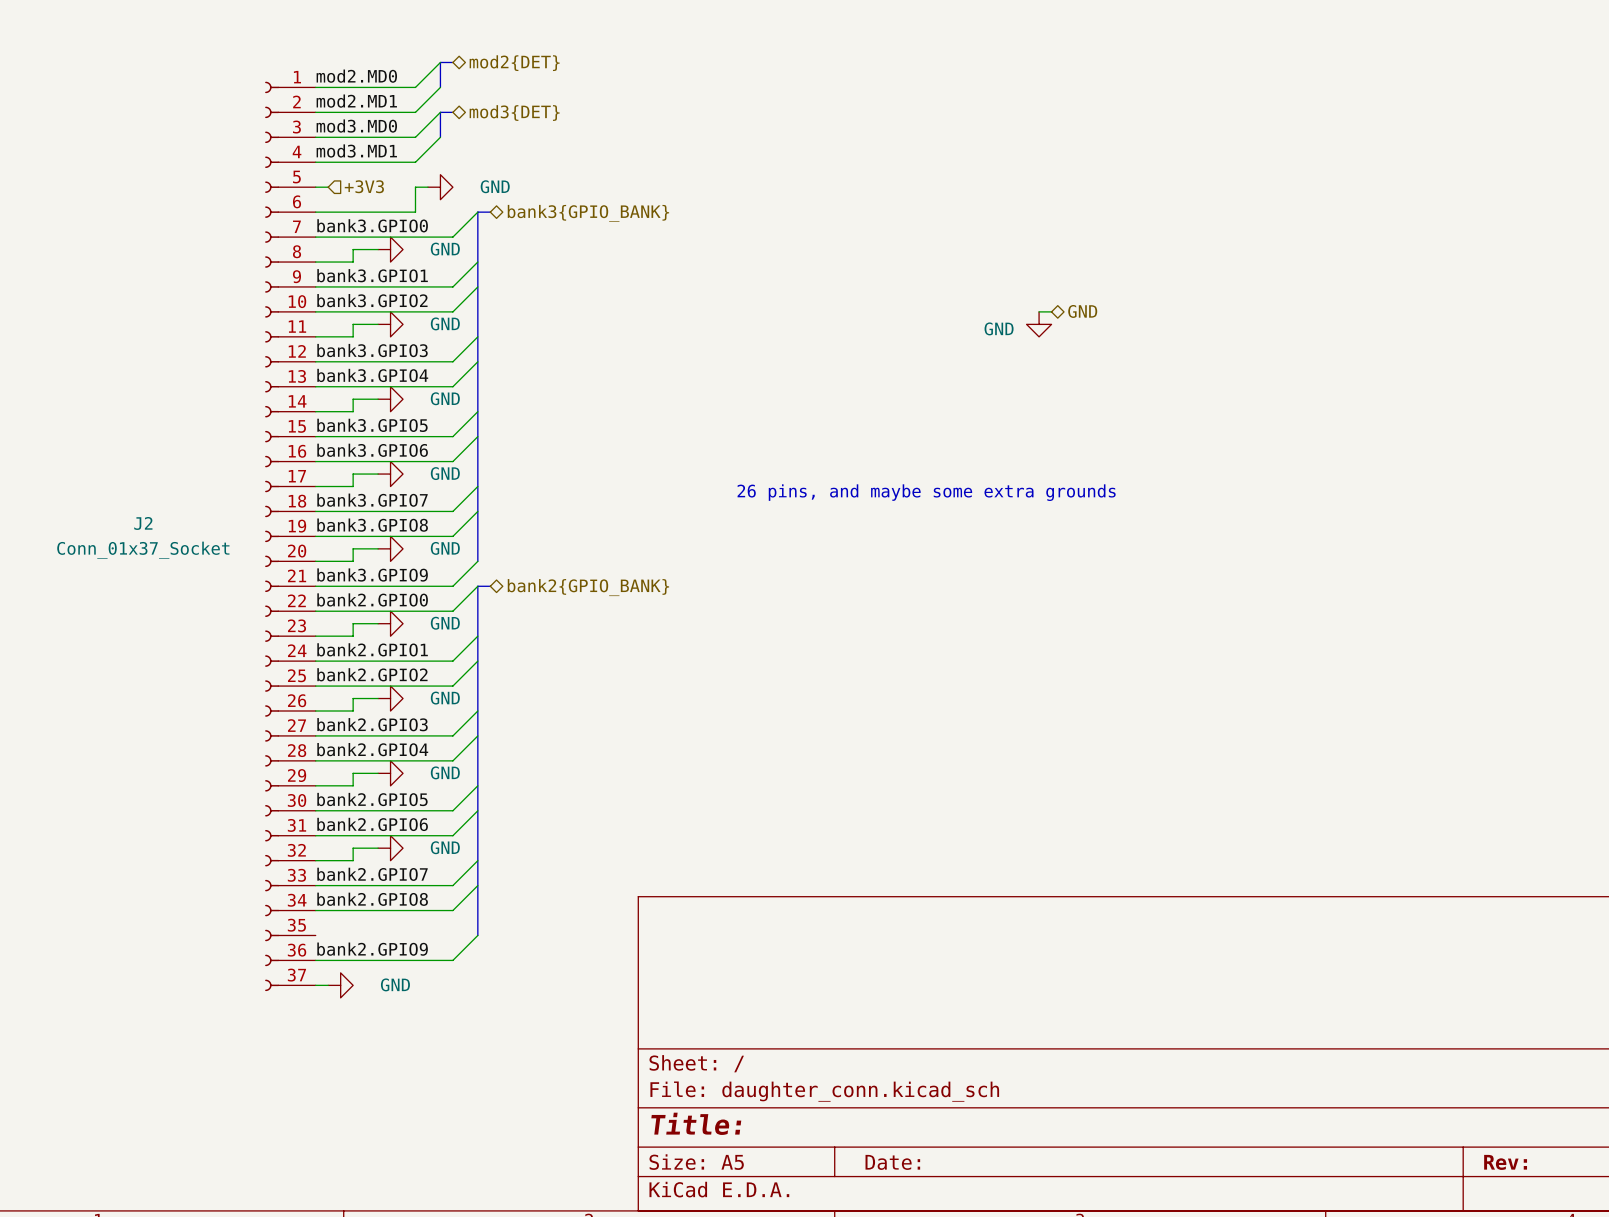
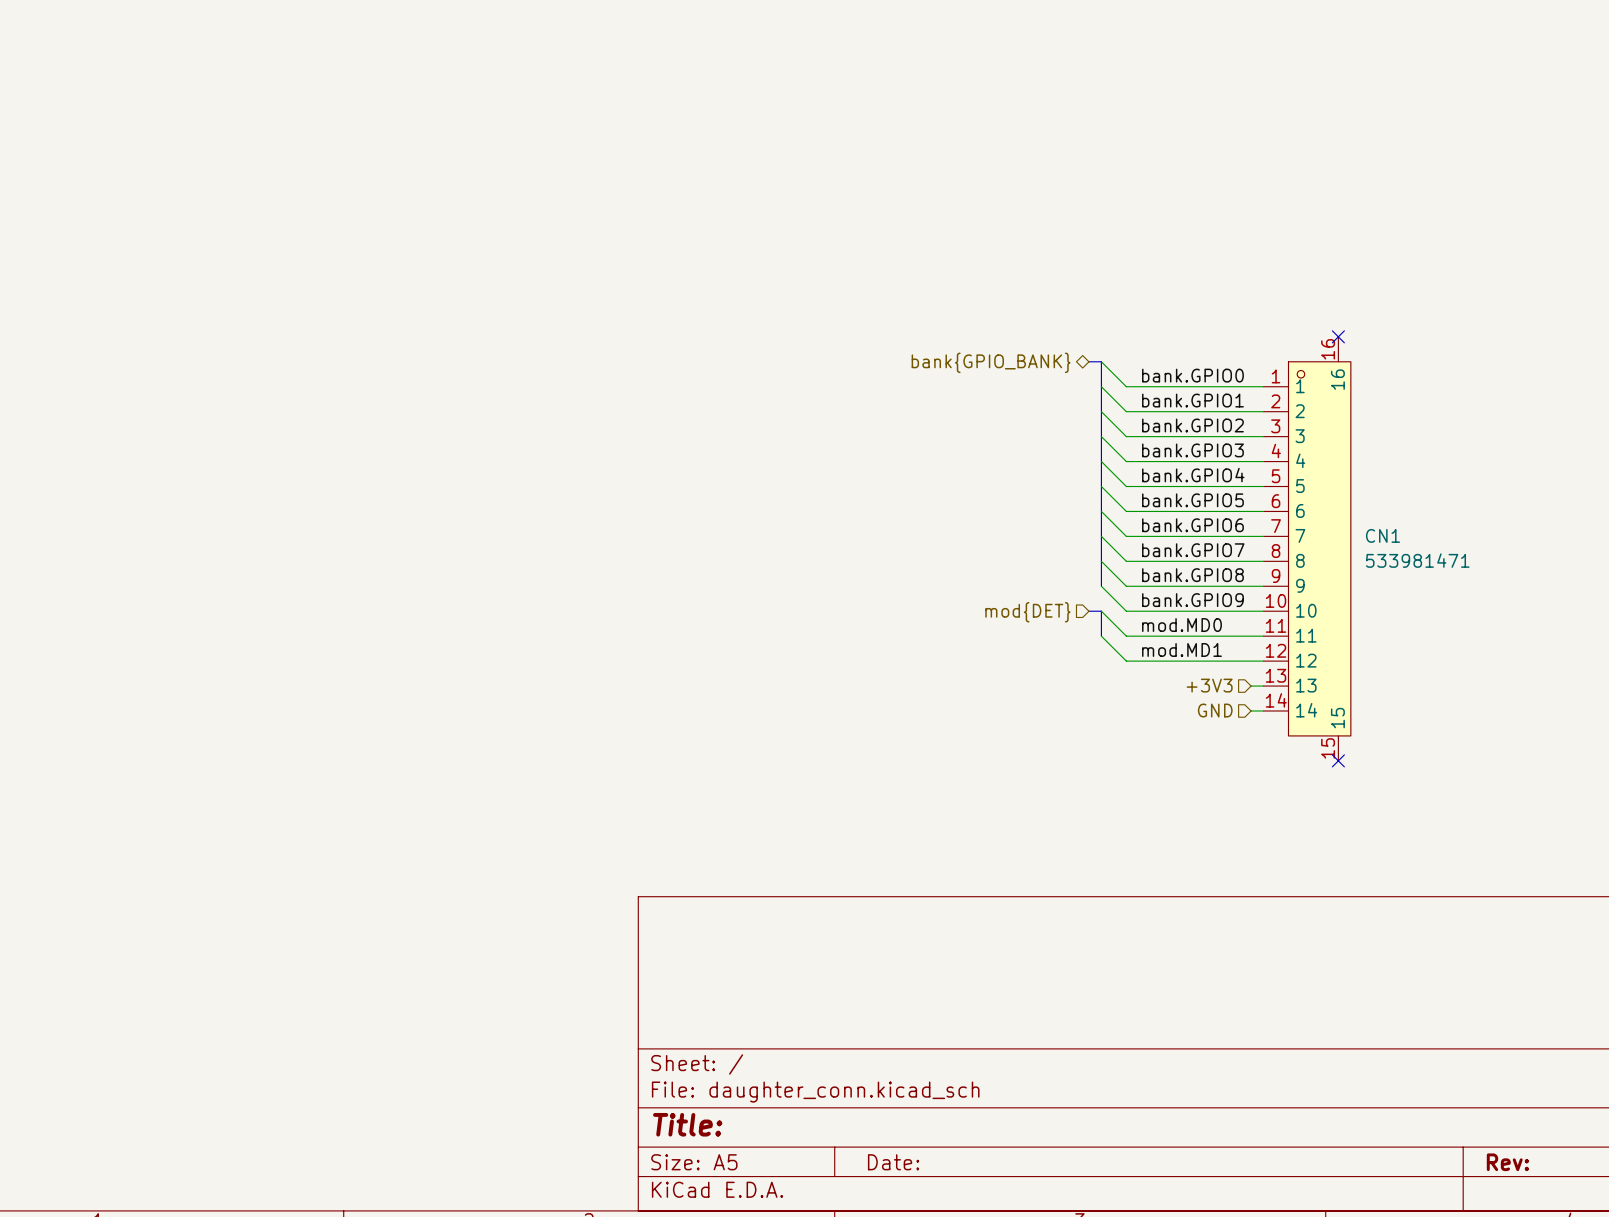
wire: (440, 62) (415, 87) (315, 87) -> none
bus: (452, 62) (440, 62) (440, 87) -> none
hierarchical label: mod2{DET} (514, 63) -> none
label: mod2.MD0 (356, 76) -> none
wire: (440, 87) (415, 112) (315, 112) -> none
label: mod2.MD1 (356, 101) -> none
wire: (440, 112) (415, 137) (315, 137) -> none
bus: (452, 112) (440, 112) (440, 137) -> none
hierarchical label: mod3{DET} (514, 113) -> none
label: mod3.MD0 (356, 126) -> none
wire: (440, 137) (415, 162) (315, 162) -> none
label: mod3.MD1 (356, 150) -> none
hierarchical label: +3V3 (364, 186) -> none
wire: (315, 187) (328, 187) -> none
wire: (427, 187) (415, 187) (415, 212) (315, 212) -> none
power symbol: GND (440, 187) -> none
wire: (477, 212) (452, 237) (315, 237) -> none
bus: (490, 212) (477, 212) (477, 561) -> none
hierarchical label: bank3{GPIO_BANK} (588, 213) -> none
label: bank3.GPIO0 (372, 225) -> none
wire: (378, 249) (353, 249) (353, 262) (315, 262) -> none
power symbol: GND (390, 249) -> none
wire: (477, 262) (452, 286) (315, 286) -> none
label: bank3.GPIO1 (372, 275) -> none
wire: (477, 286) (452, 311) (315, 311) -> none
label: bank3.GPIO2 (372, 300) -> none
wire: (1039, 311) (1051, 311) -> none
hierarchical label: GND (1082, 311) -> none
wire: (378, 324) (353, 324) (353, 336) (315, 336) -> none
power symbol: GND (390, 324) -> none
power symbol: GND (1039, 324) -> none
wire: (477, 336) (452, 361) (315, 361) -> none
no-connect mark: none -> (1338, 336)
label: bank3.GPIO3 (372, 350) -> none
wire: (477, 361) (452, 386) (315, 386) -> none
bus: none -> (1088, 361) (1101, 361) (1101, 586)
wire: none -> (1101, 361) (1126, 386) (1263, 386)
hierarchical label: none -> bank{GPIO_BANK} (991, 362)
label: bank3.GPIO4 (372, 375) -> none
label: none -> bank.GPIO0 (1192, 375)
wire: none -> (1101, 386) (1126, 411) (1263, 411)
wire: (378, 399) (353, 399) (353, 411) (315, 411) -> none
power symbol: GND (390, 399) -> none
label: none -> bank.GPIO1 (1192, 400)
wire: (477, 411) (452, 436) (315, 436) -> none
wire: none -> (1101, 411) (1126, 436) (1263, 436)
label: bank3.GPIO5 (372, 425) -> none
label: none -> bank.GPIO2 (1192, 425)
wire: (477, 436) (452, 461) (315, 461) -> none
wire: none -> (1101, 436) (1126, 461) (1263, 461)
label: bank3.GPIO6 (372, 450) -> none
label: none -> bank.GPIO3 (1192, 450)
wire: none -> (1101, 461) (1126, 486) (1263, 486)
wire: (378, 474) (353, 474) (353, 486) (315, 486) -> none
power symbol: GND (390, 474) -> none
label: none -> bank.GPIO4 (1193, 475)
wire: (477, 486) (452, 511) (315, 511) -> none
wire: none -> (1101, 486) (1126, 511) (1263, 511)
text: 26 pins, and maybe some extra grounds (926, 492) -> none
label: bank3.GPIO7 (372, 500) -> none
label: none -> bank.GPIO5 (1192, 500)
wire: (477, 511) (452, 536) (315, 536) -> none
wire: none -> (1101, 511) (1126, 536) (1263, 536)
label: bank3.GPIO8 (372, 525) -> none
label: none -> bank.GPIO6 (1192, 525)
J2: Conn_01x37_Socket (290, 536) -> none
wire: none -> (1101, 536) (1126, 561) (1263, 561)
wire: (378, 548) (353, 548) (353, 561) (315, 561) -> none
power symbol: GND (390, 548) -> none
CN1: none -> 533981471 (1307, 548)
label: none -> bank.GPIO7 (1193, 550)
wire: (477, 561) (452, 586) (315, 586) -> none
wire: none -> (1101, 561) (1126, 586) (1263, 586)
label: bank3.GPIO9 (372, 575) -> none
label: none -> bank.GPIO8 (1192, 575)
wire: (477, 586) (452, 611) (315, 611) -> none
bus: (490, 586) (477, 586) (477, 935) -> none
wire: none -> (1101, 586) (1126, 611) (1263, 611)
hierarchical label: bank2{GPIO_BANK} (588, 587) -> none
label: bank2.GPIO0 (372, 599) -> none
label: none -> bank.GPIO9 (1192, 600)
hierarchical label: none -> mod{DET} (1027, 612)
bus: none -> (1088, 611) (1101, 611) (1101, 636)
wire: none -> (1101, 611) (1126, 636) (1263, 636)
wire: (378, 623) (353, 623) (353, 636) (315, 636) -> none
power symbol: GND (390, 623) -> none
label: none -> mod.MD0 (1181, 625)
wire: (477, 636) (452, 661) (315, 661) -> none
wire: none -> (1101, 636) (1126, 661) (1263, 661)
label: bank2.GPIO1 (372, 649) -> none
label: none -> mod.MD1 (1181, 649)
wire: (477, 661) (452, 686) (315, 686) -> none
label: bank2.GPIO2 (372, 674) -> none
hierarchical label: none -> +3V3 (1209, 685)
wire: none -> (1251, 686) (1263, 686)
wire: (378, 698) (353, 698) (353, 710) (315, 710) -> none
power symbol: GND (390, 698) -> none
wire: (477, 710) (452, 735) (315, 735) -> none
hierarchical label: none -> GND (1215, 710)
wire: none -> (1251, 710) (1263, 710)
label: bank2.GPIO3 (372, 724) -> none
wire: (477, 735) (452, 760) (315, 760) -> none
label: bank2.GPIO4 (372, 749) -> none
no-connect mark: none -> (1338, 760)
wire: (378, 773) (353, 773) (353, 785) (315, 785) -> none
power symbol: GND (390, 773) -> none
wire: (477, 785) (452, 810) (315, 810) -> none
label: bank2.GPIO5 (372, 799) -> none
wire: (477, 810) (452, 835) (315, 835) -> none
label: bank2.GPIO6 (372, 824) -> none
wire: (378, 848) (353, 848) (353, 860) (315, 860) -> none
power symbol: GND (390, 848) -> none
wire: (477, 860) (452, 885) (315, 885) -> none
label: bank2.GPIO7 (372, 874) -> none
wire: (477, 885) (452, 910) (315, 910) -> none
label: bank2.GPIO8 (372, 899) -> none
wire: (477, 935) (452, 960) (315, 960) -> none
label: bank2.GPIO9 (372, 949) -> none
wire: (315, 985) (328, 985) -> none
power symbol: GND (340, 985) -> none

